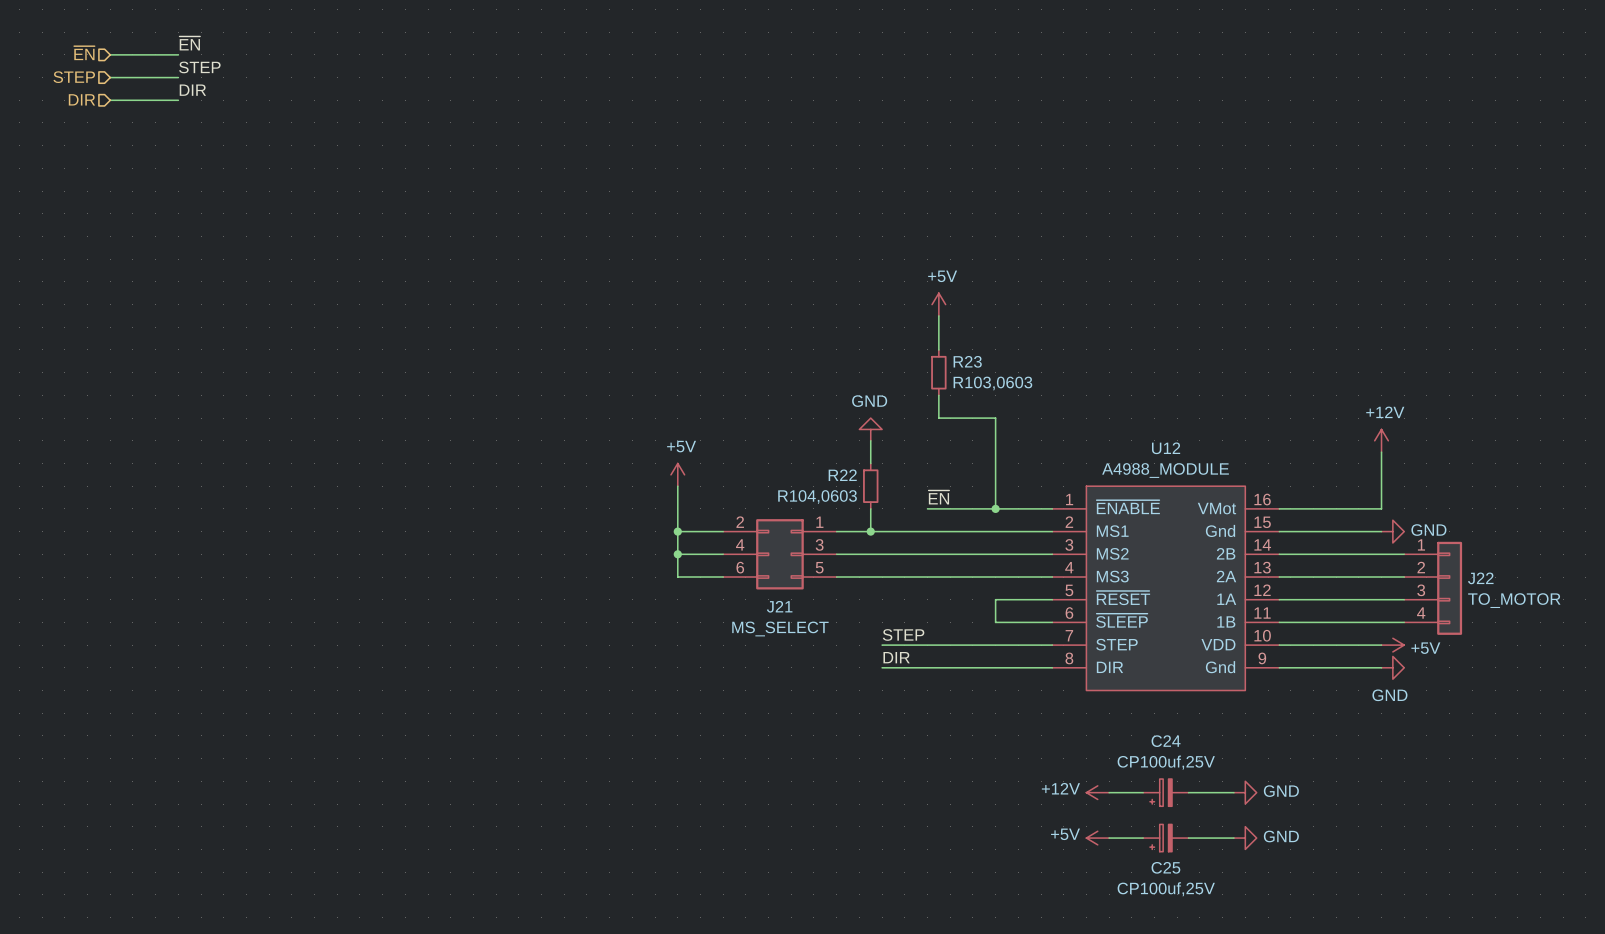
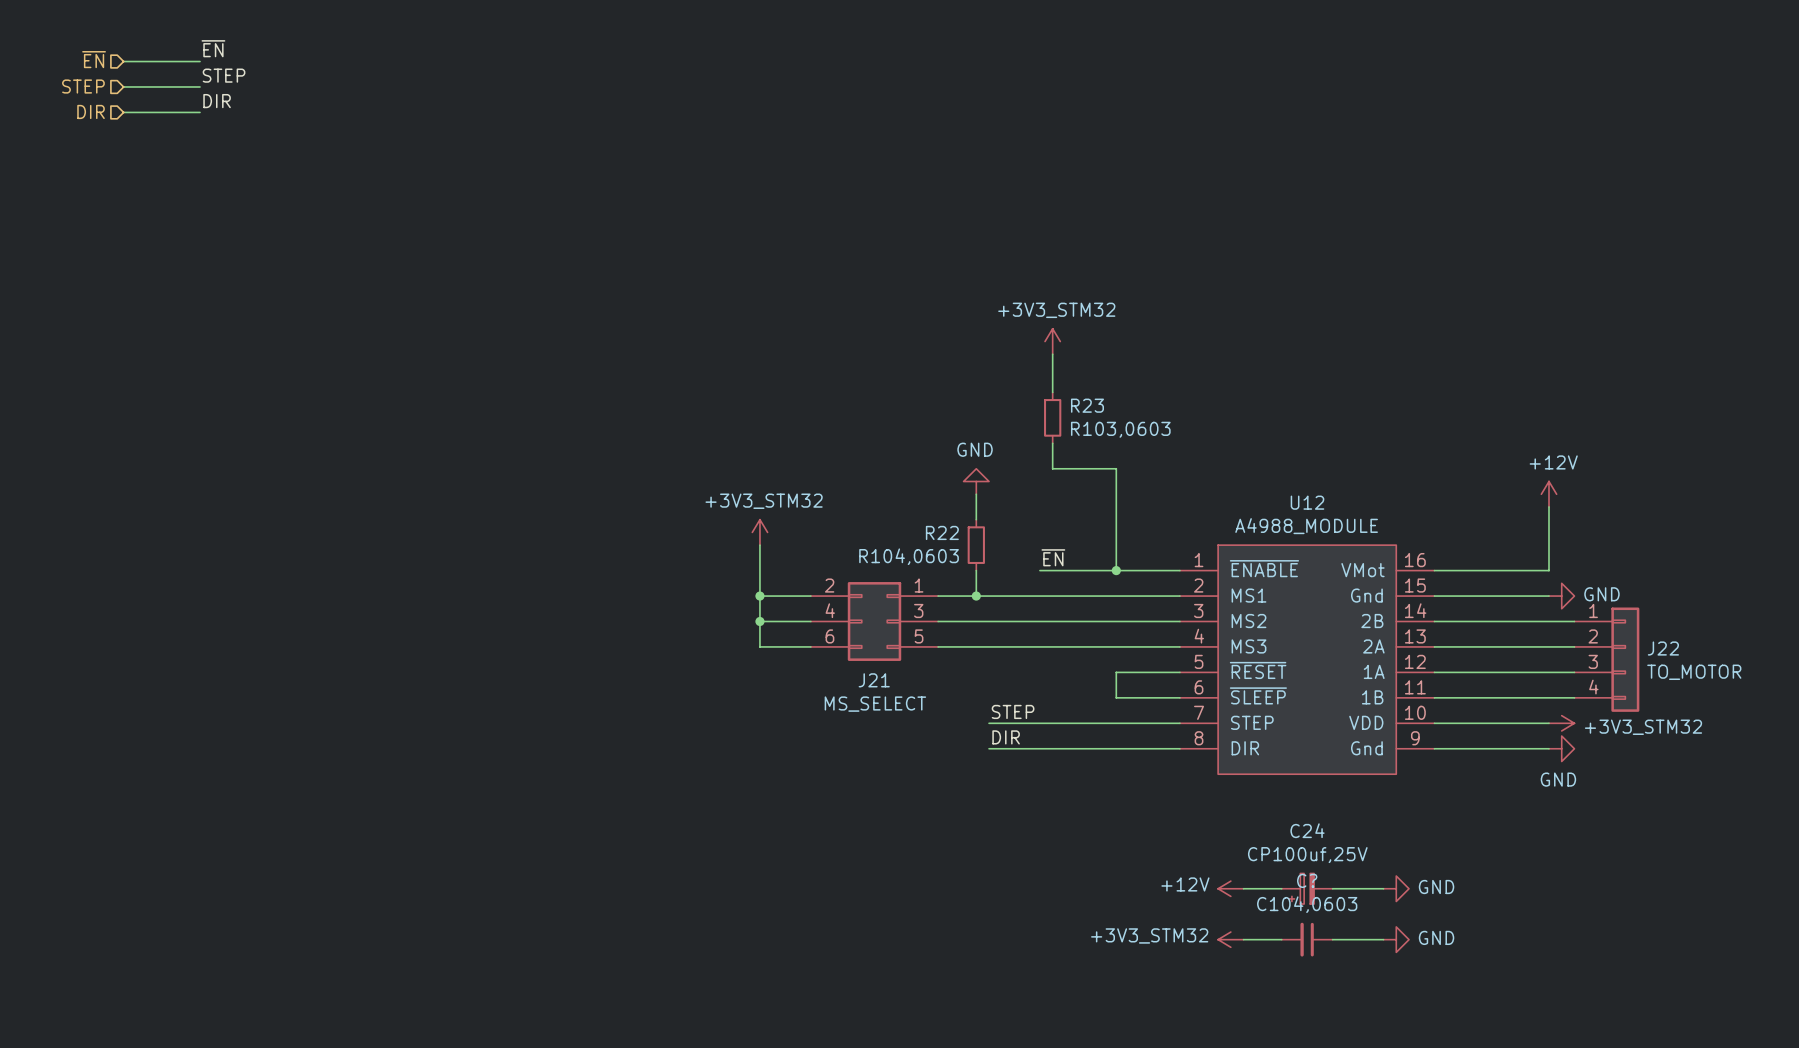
power symbol: +5V (938, 304) -> +3V3_STM32 (1052, 341)
power symbol: +5V (677, 474) -> +3V3_STM32 (759, 532)
power symbol: +5V (1392, 645) -> +3V3_STM32 (1561, 723)
power symbol: +5V (1097, 838) -> +3V3_STM32 (1230, 939)
C25: CP100uf,25V (1165, 838) -> none
C?: none -> C104,0603 (1307, 939)

